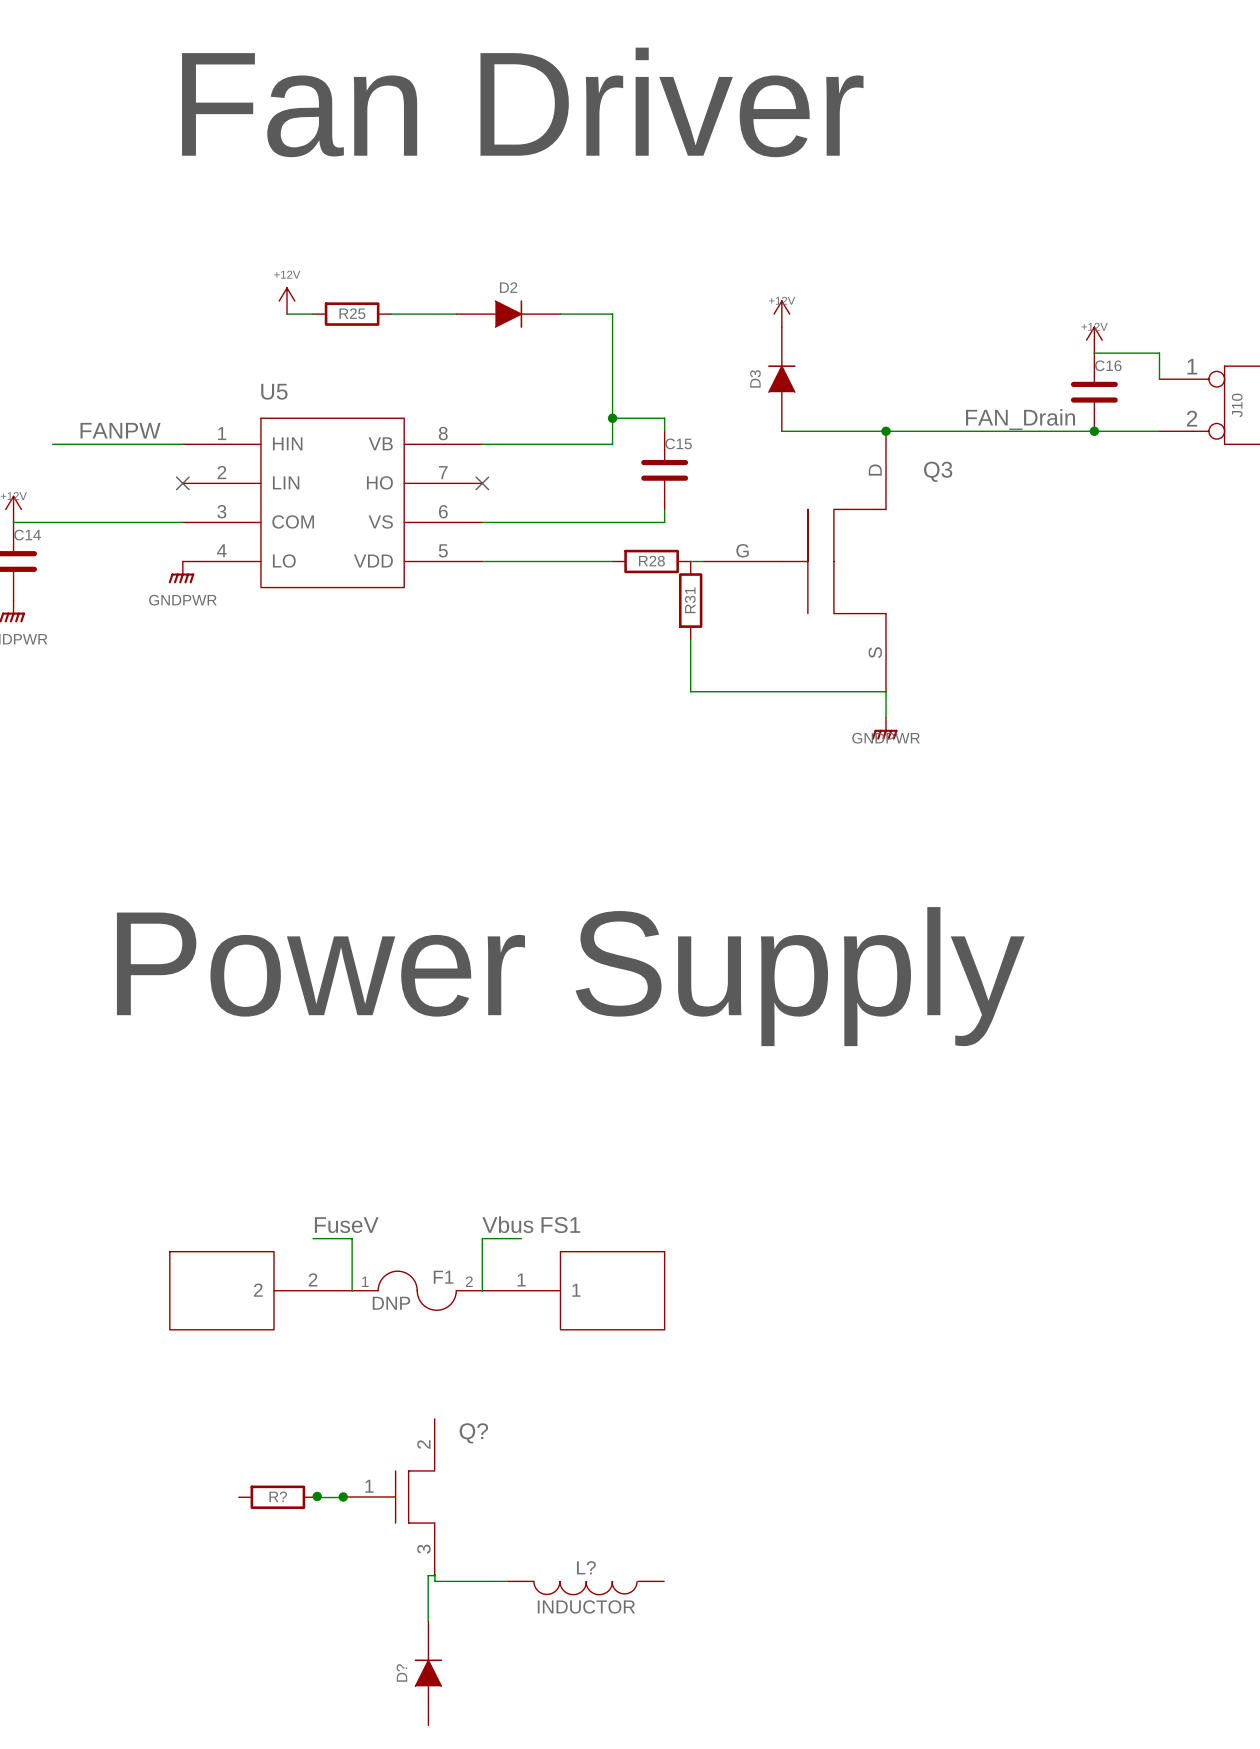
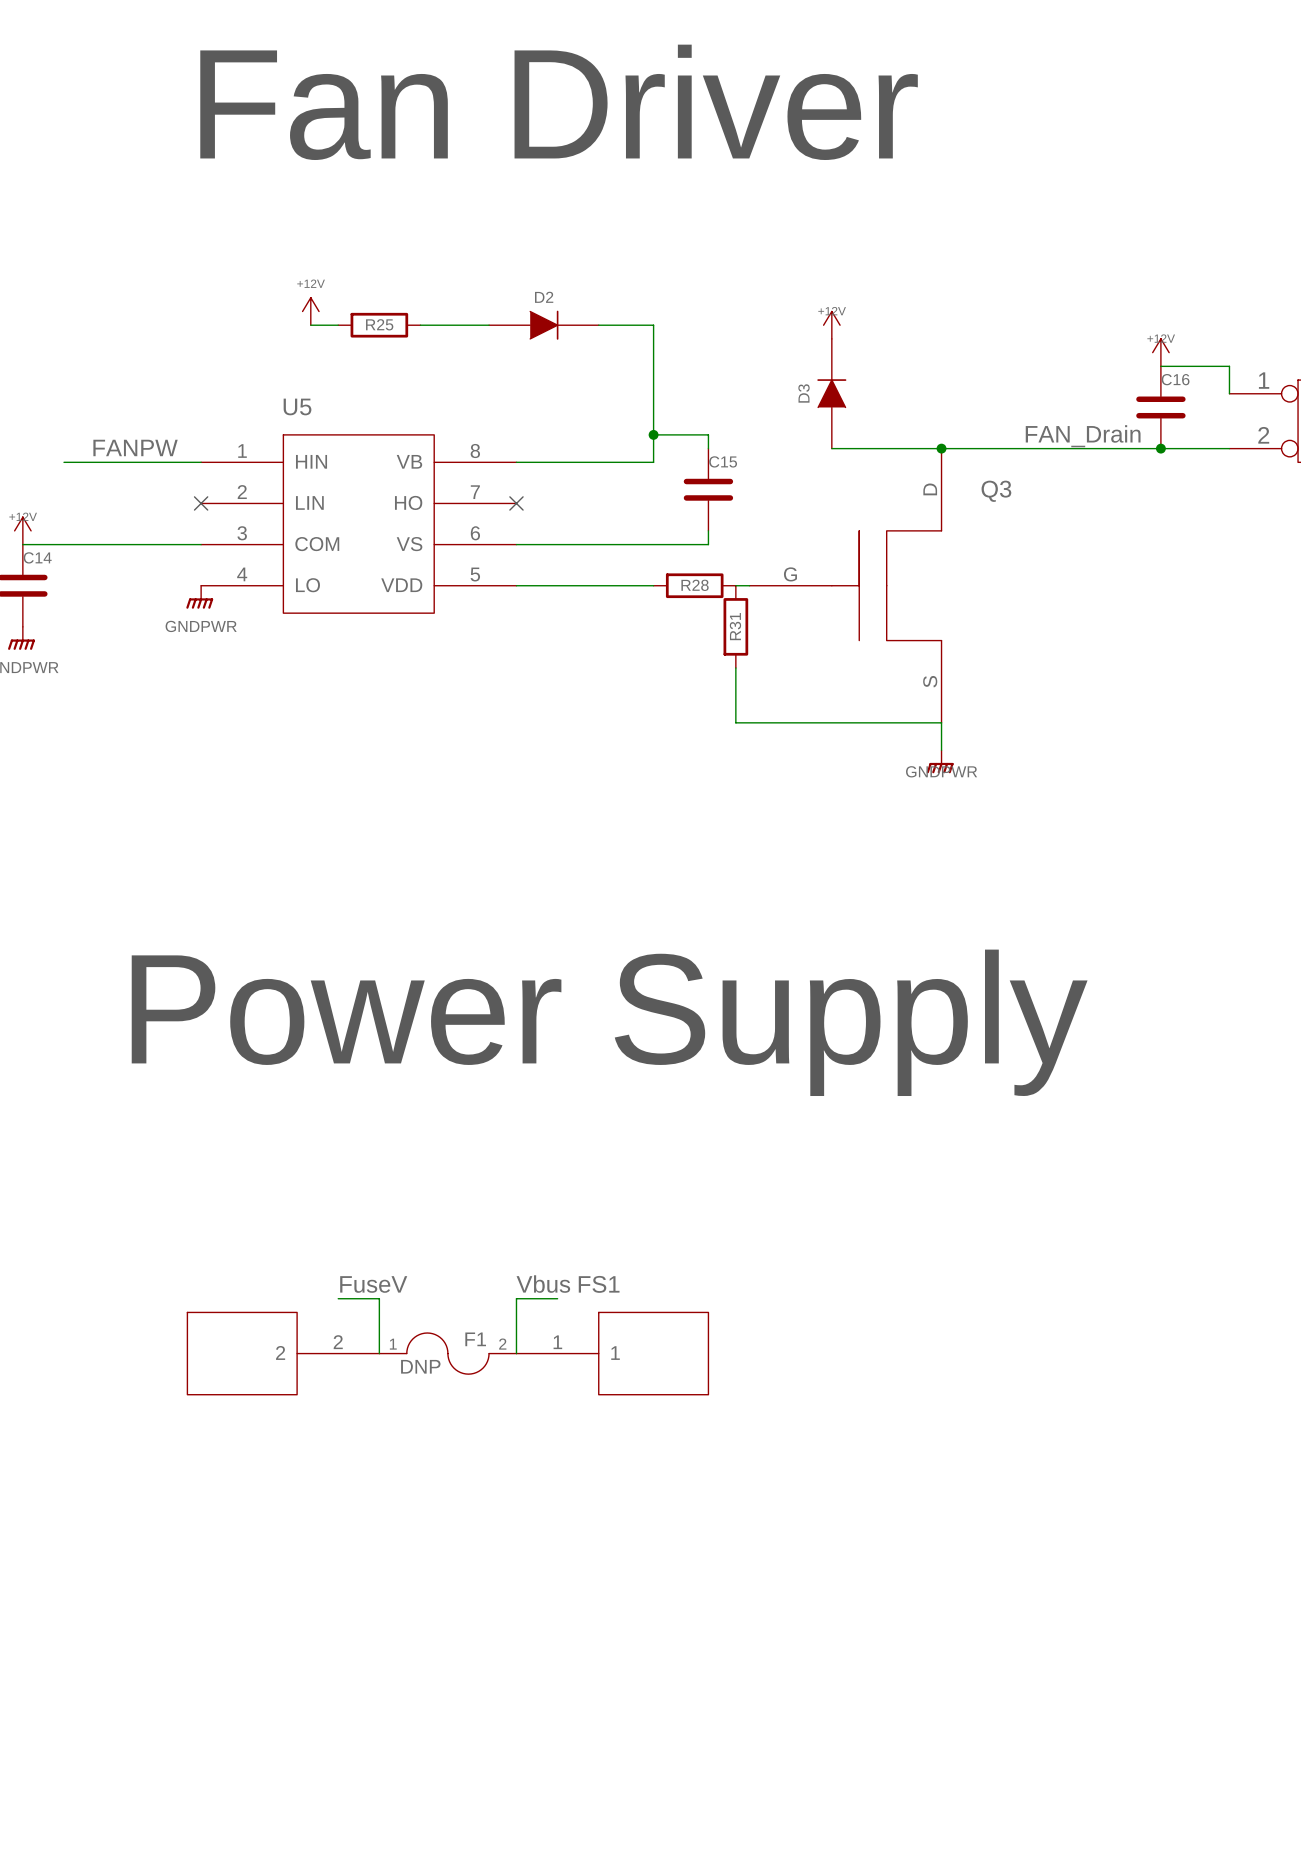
wire: (344, 1495) (344, 1497) (318, 1497) -> none
junction: (317, 1496) -> none
R?: (277, 1497) -> none
junction: (343, 1497) -> none
Q?: (389, 1497) -> none
wire: (434, 1574) (434, 1581) (507, 1581) -> none
wire: (434, 1575) (428, 1575) (428, 1620) -> none
L?: INDUCTOR (585, 1588) -> none
D?: (428, 1673) -> none

